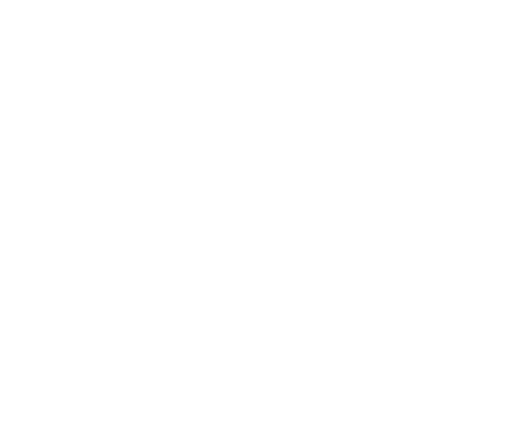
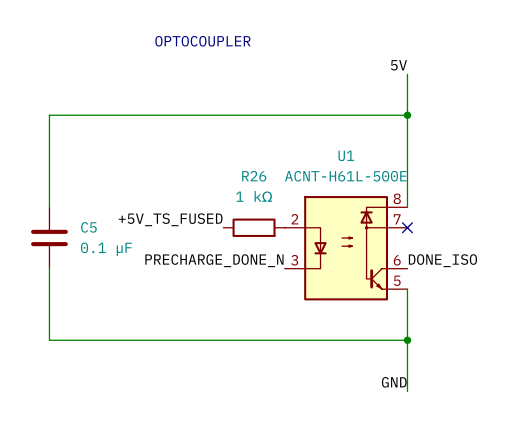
text: none -> OPTOCOUPLER (202, 41)
label: none -> 5V (398, 65)
wire: none -> (407, 74) (407, 207)
wire: none -> (407, 115) (49, 115) (49, 207)
junction: none -> (407, 115)
label: none -> +5V_TS_FUSED (170, 219)
R26: none -> 1 kΩ (254, 227)
no-connect mark: none -> (407, 227)
C5: none -> 0.1 µF (49, 237)
U1: none -> ACNT-H61L-500E (346, 248)
label: none -> PRECHARGE_DONE_N (214, 260)
label: none -> DONE_ISO (442, 260)
wire: none -> (49, 268) (49, 340) (407, 340)
wire: none -> (407, 289) (407, 391)
junction: none -> (407, 340)
label: none -> GND (394, 382)

